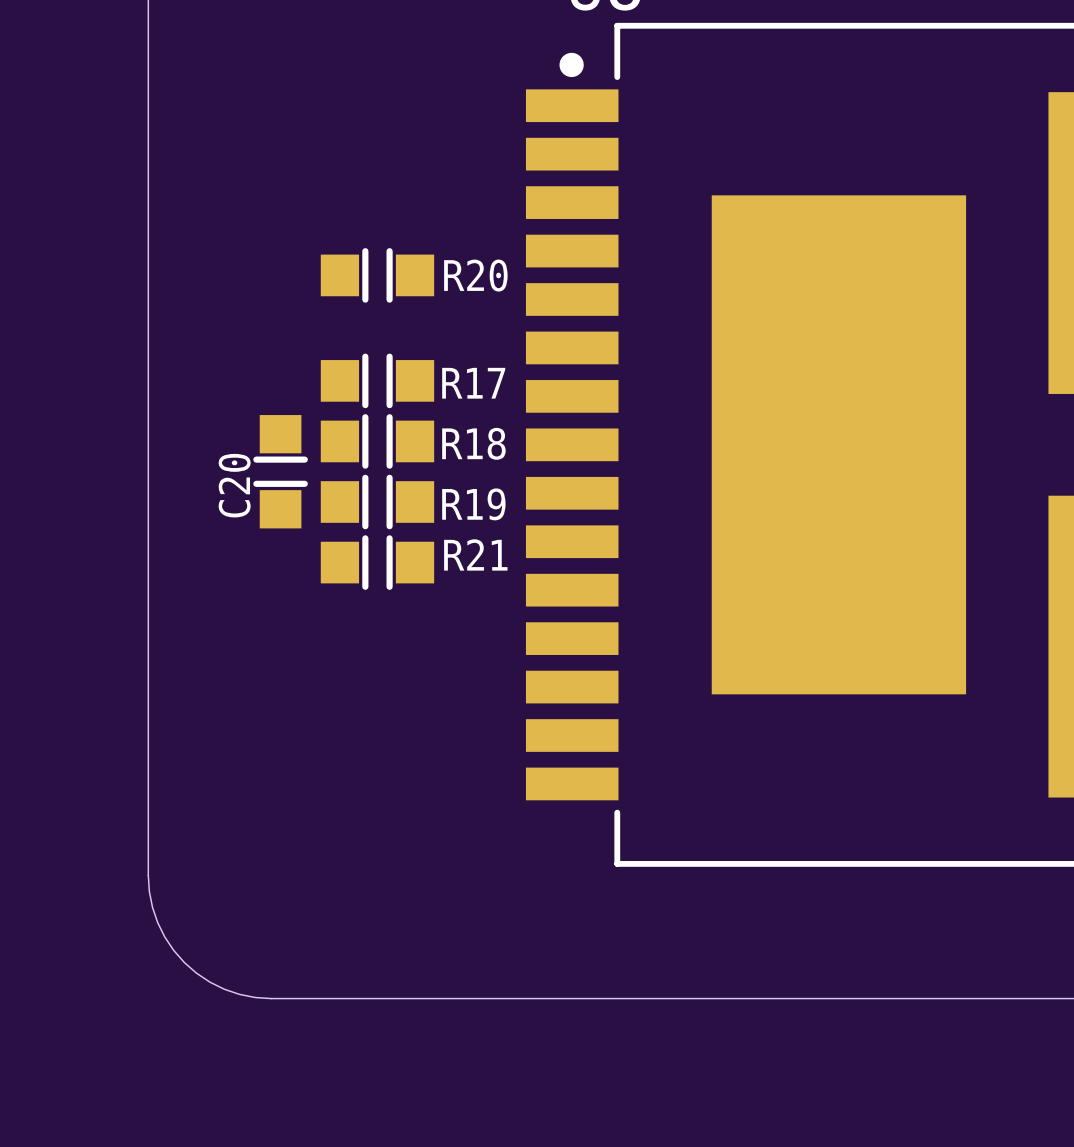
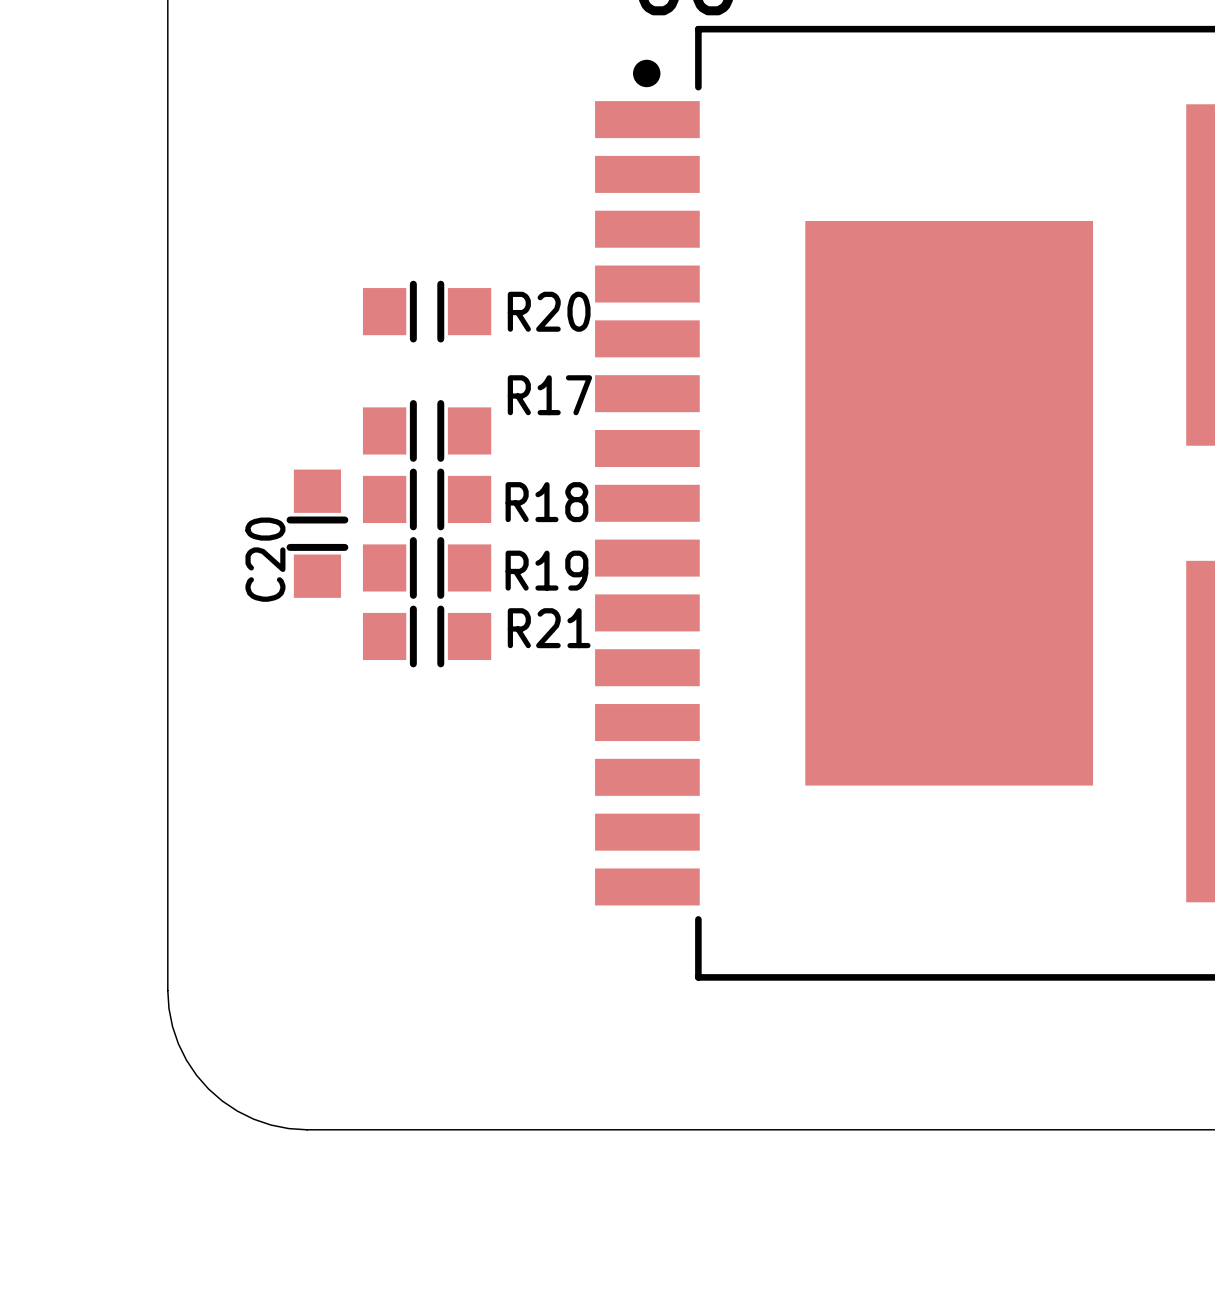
R17 name position: R17 (473, 383) -> R17 (549, 395)

